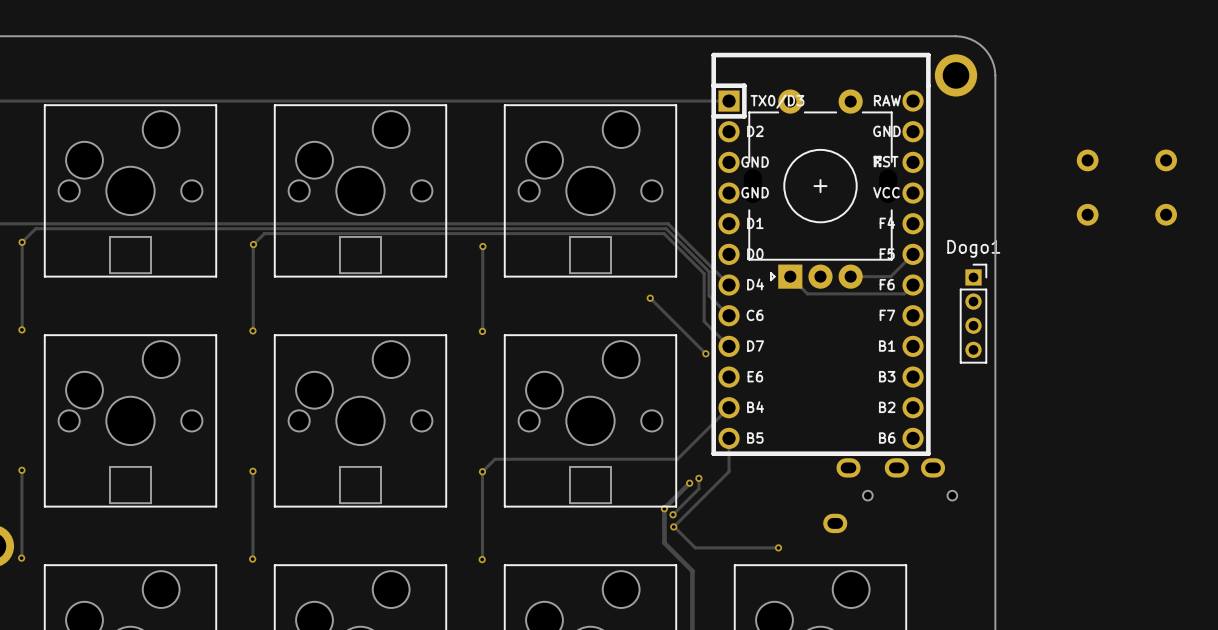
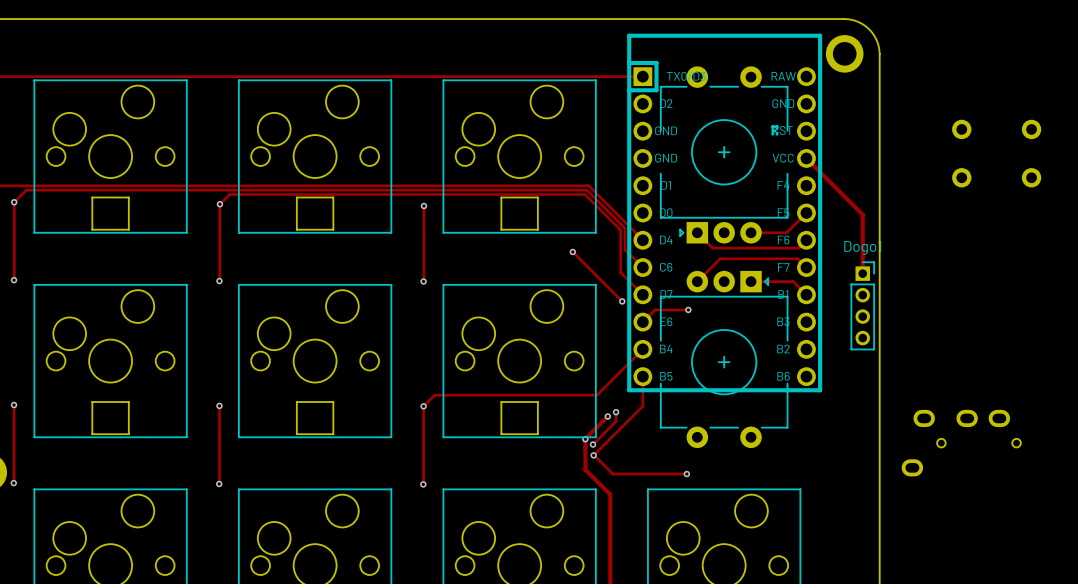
track: none -> (806, 158) (862, 214) (862, 273)
Dogo1 position: (973, 313) -> (862, 305)
track: none -> (806, 267) (797, 258) (720, 258) (697, 281)
track: none -> (751, 281) (793, 281) (806, 294)
track: none -> (688, 309) (654, 309) (642, 322)
via: none -> (688, 309)
part: none -> (724, 359)
part position: (890, 495) -> (961, 443)

